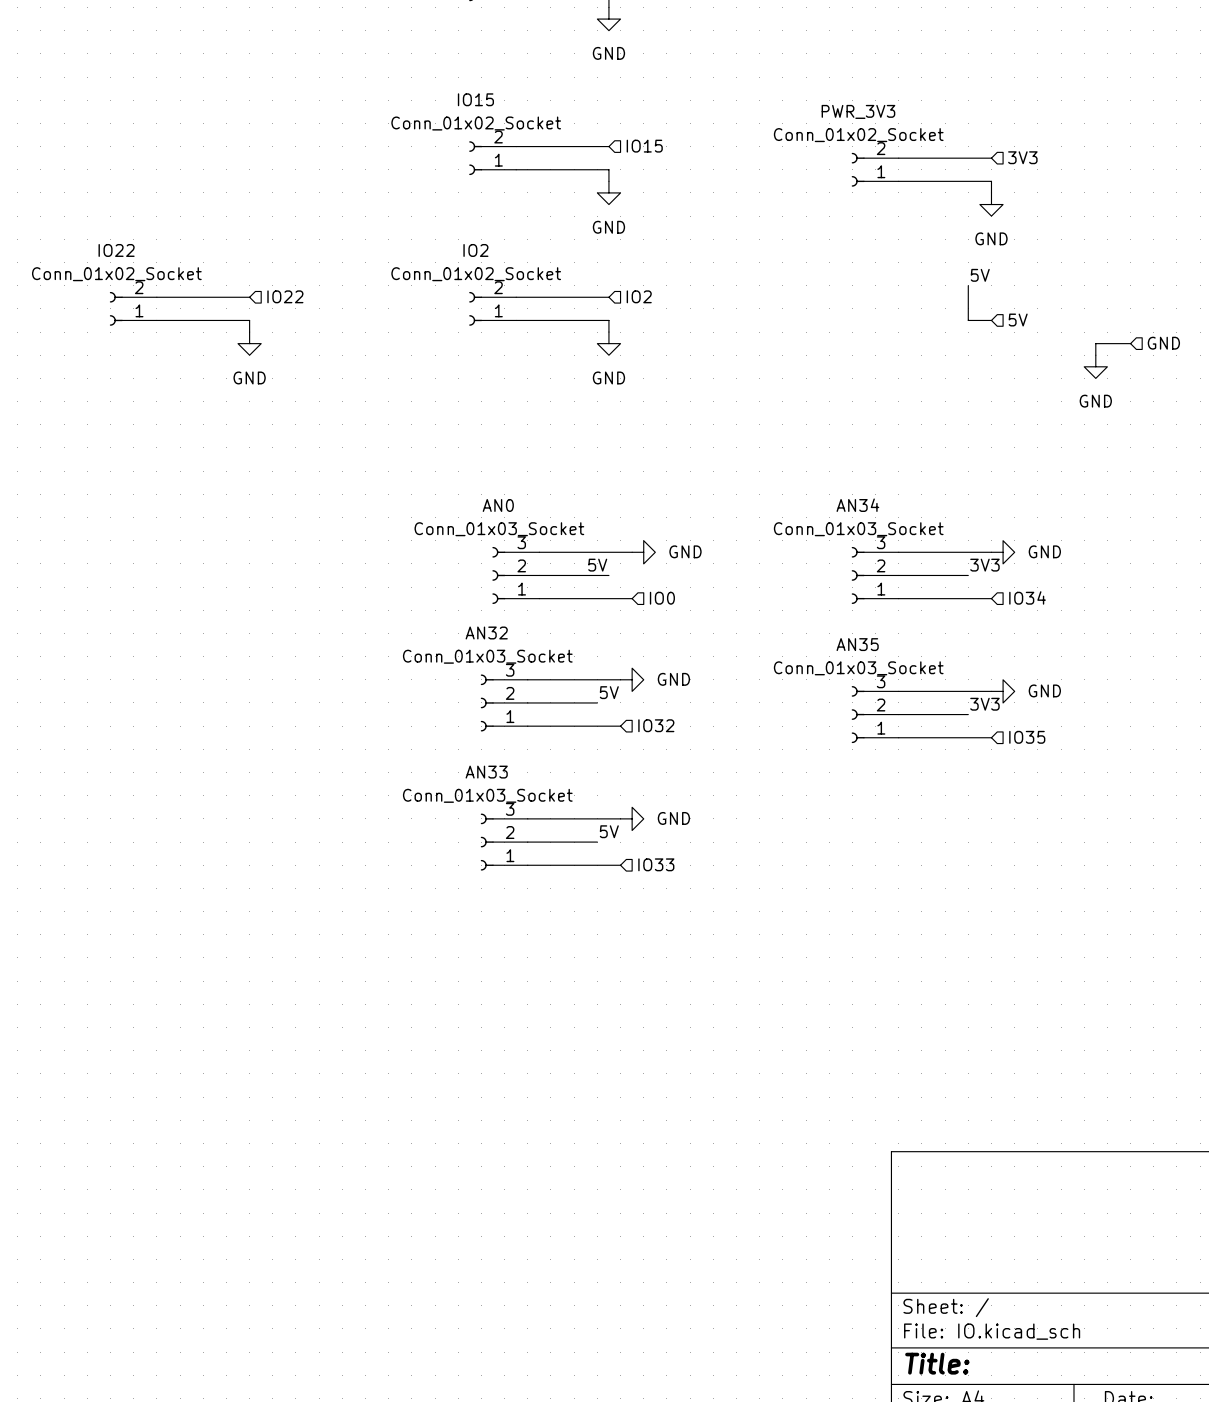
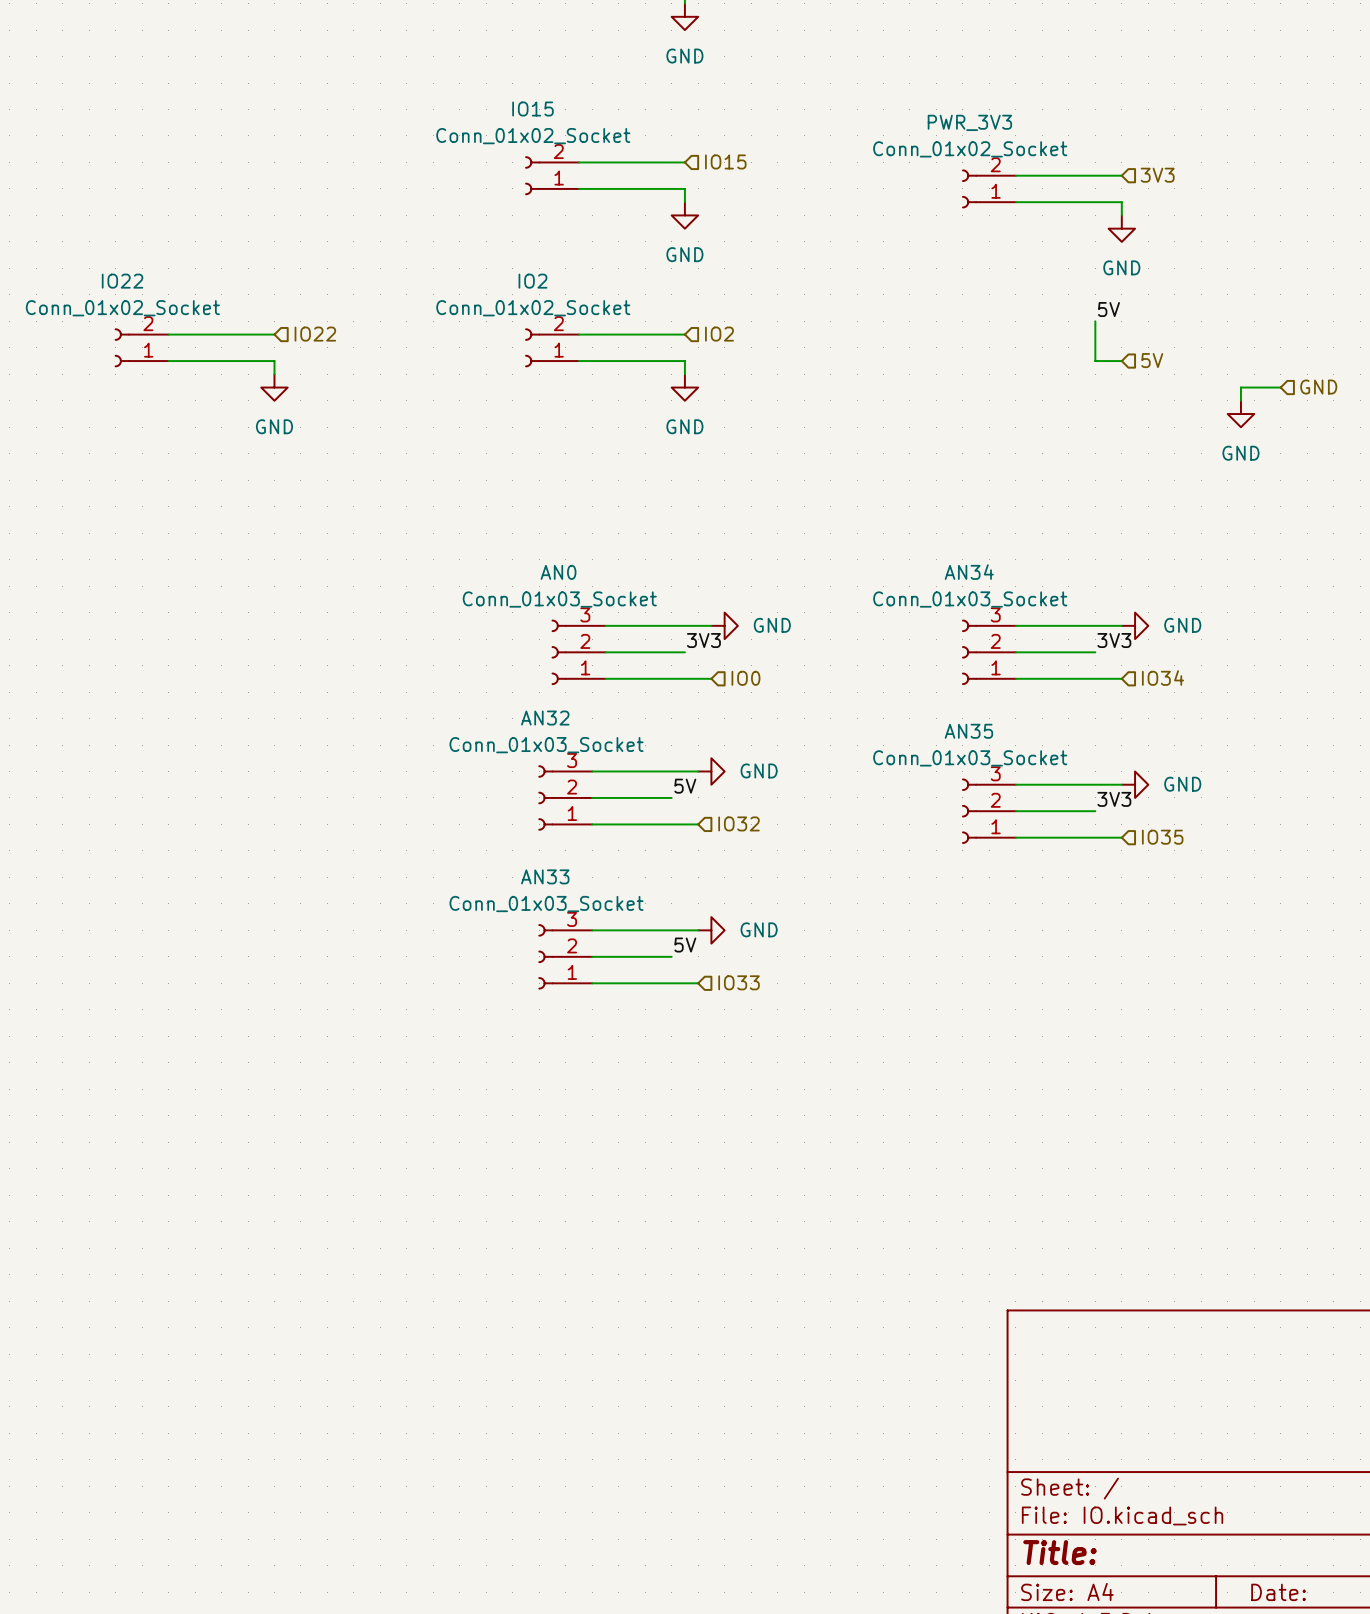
label: 5V (597, 565) -> none
label: none -> 3V3 (703, 640)

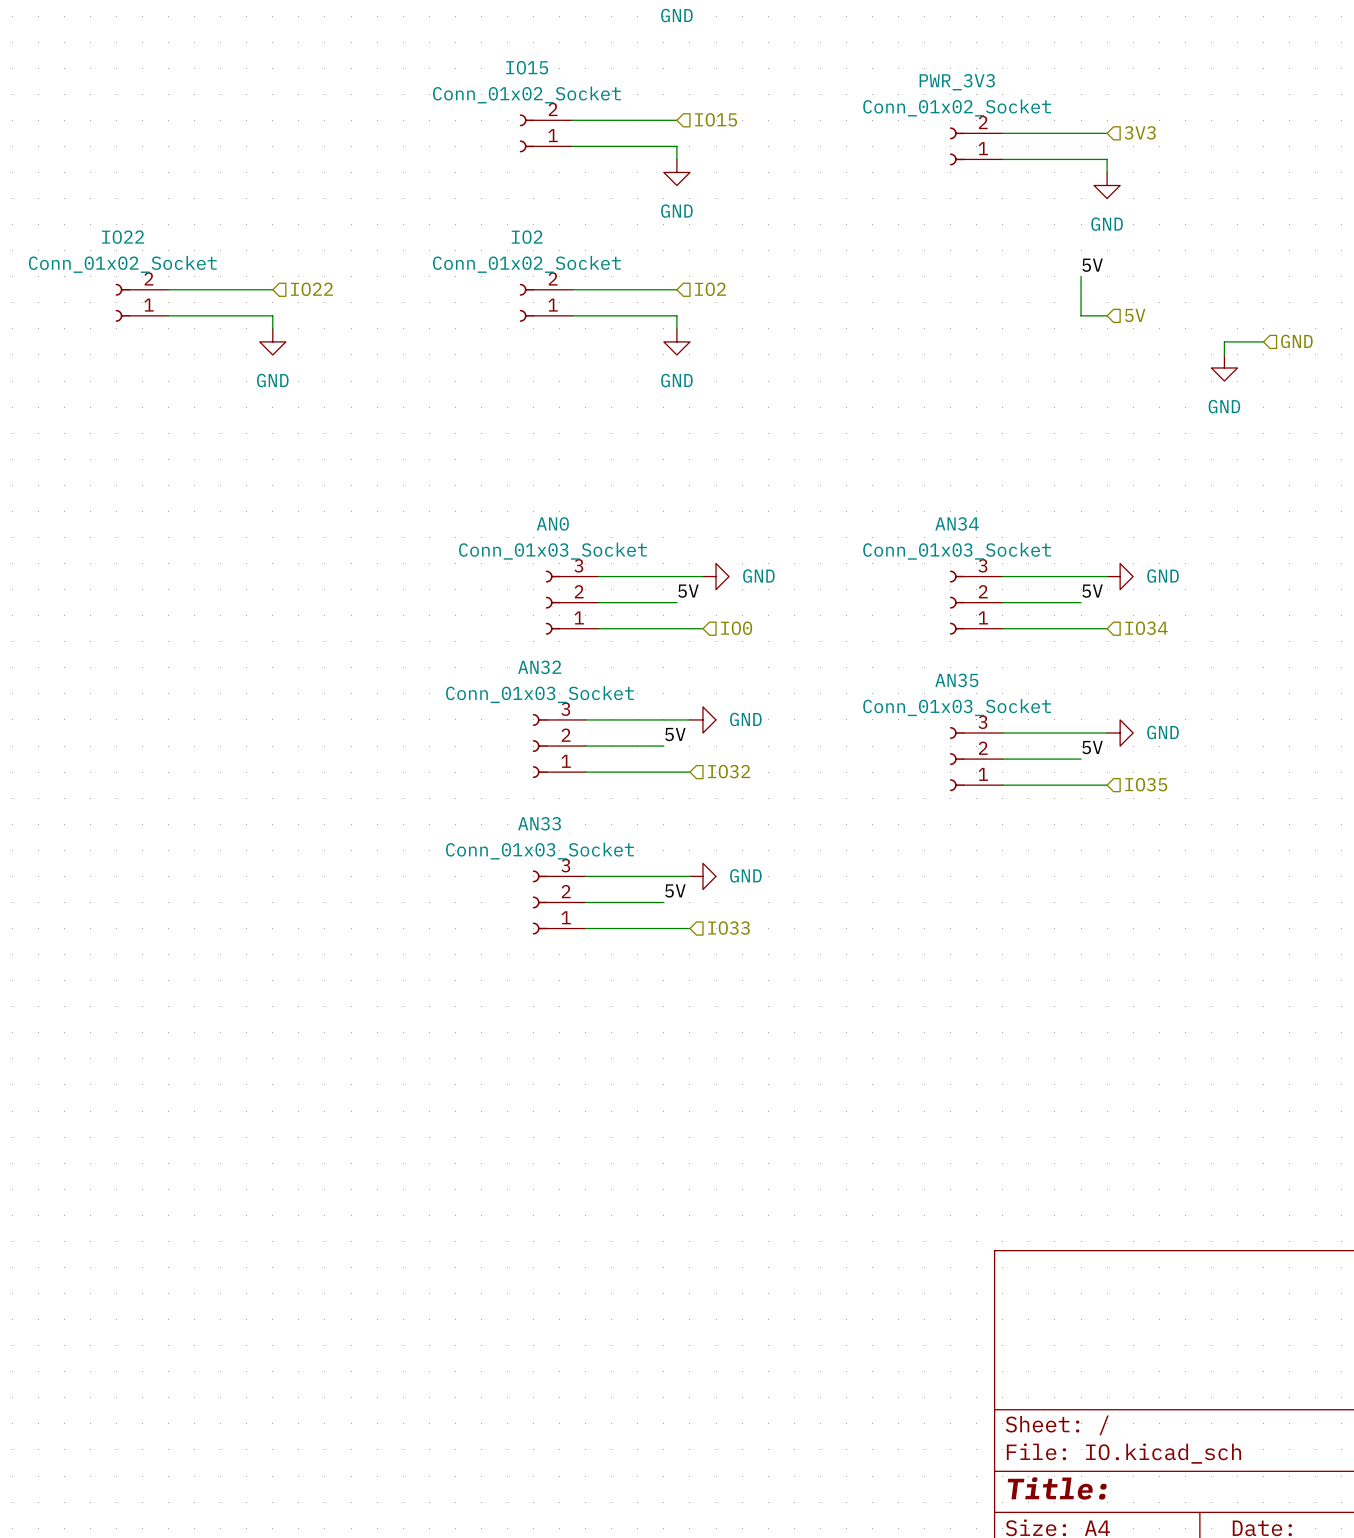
label: 3V3 (703, 640) -> 5V (688, 591)
label: 3V3 (1114, 640) -> 5V (1092, 591)
label: 3V3 (1114, 799) -> 5V (1092, 747)

